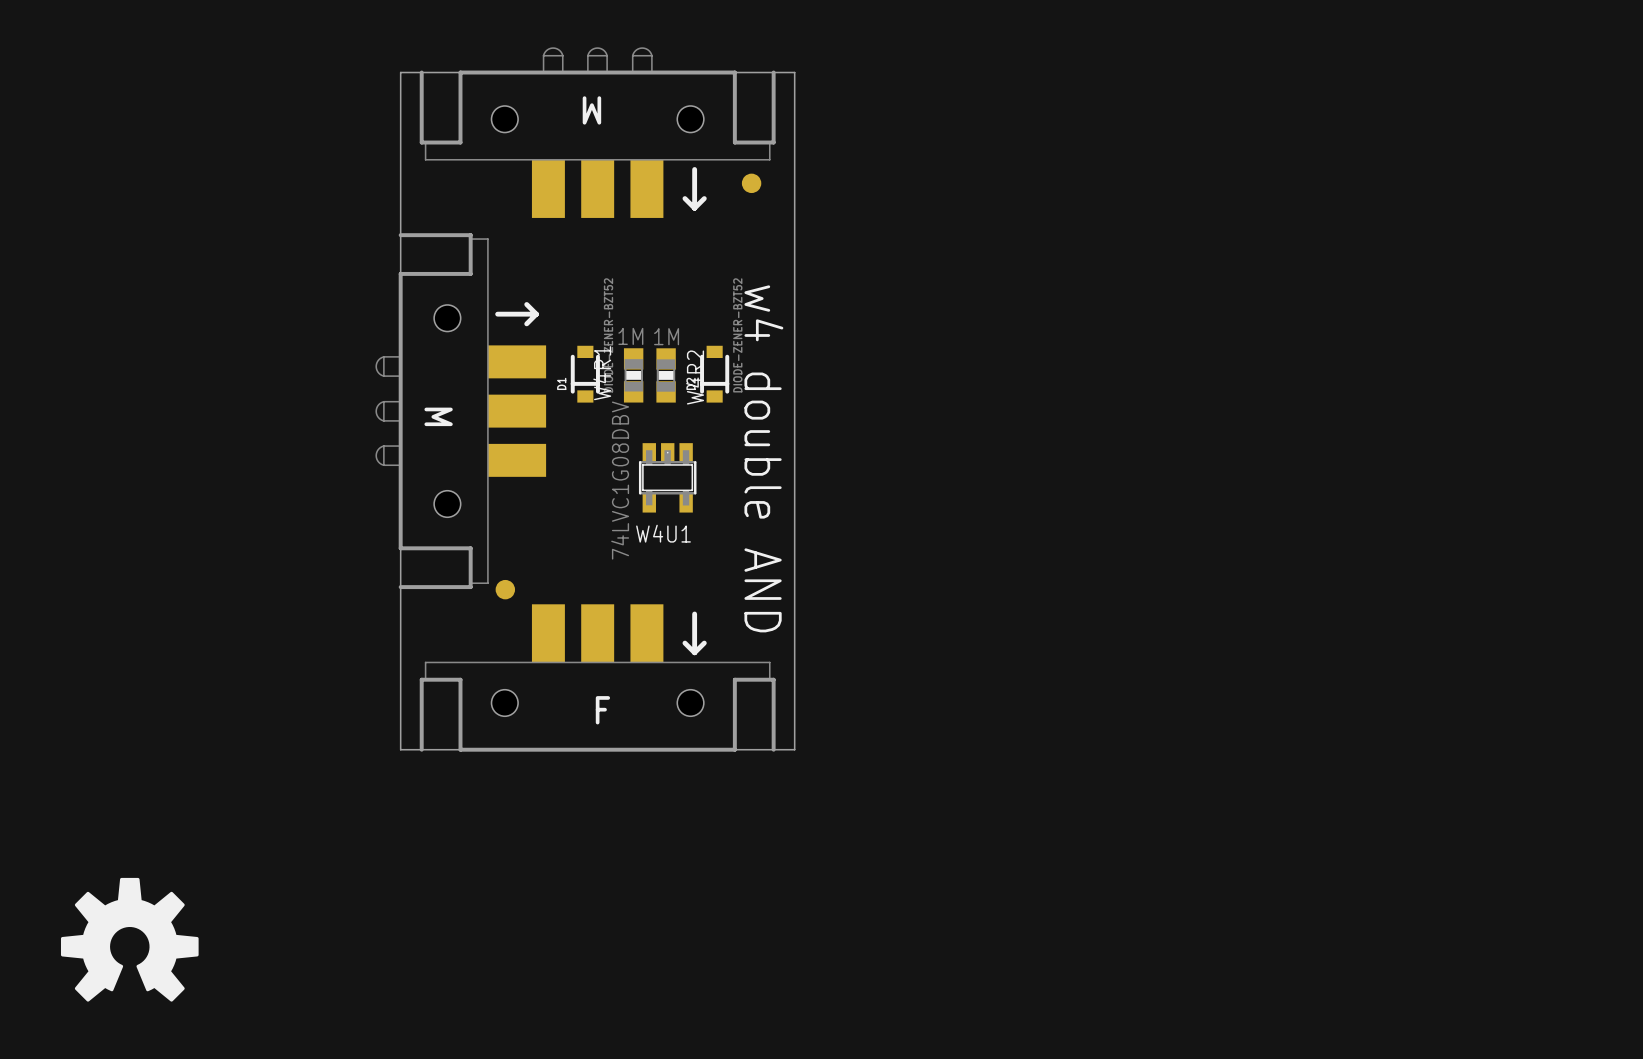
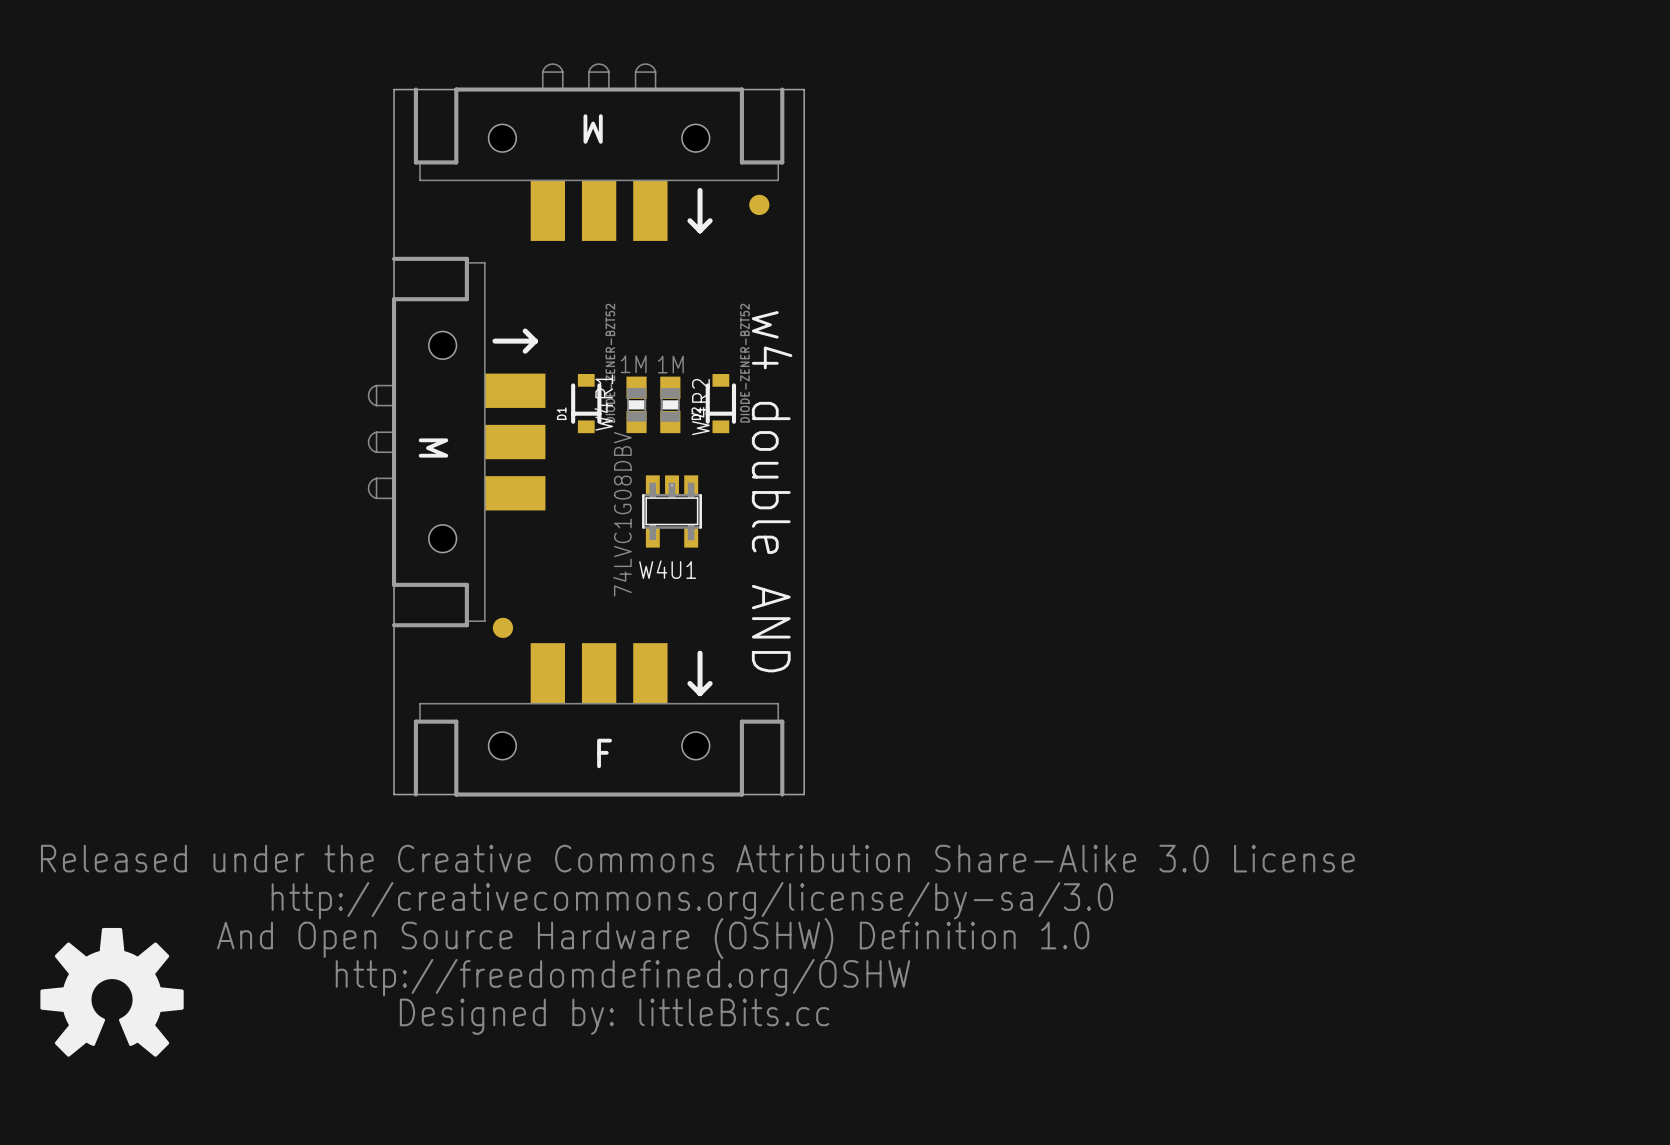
drawing: none -> [40, 844, 1355, 1035]

